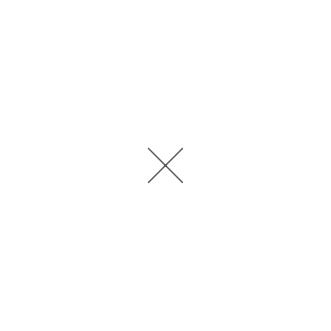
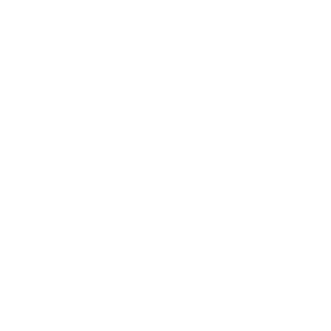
no-connect mark: (165, 165) -> none

